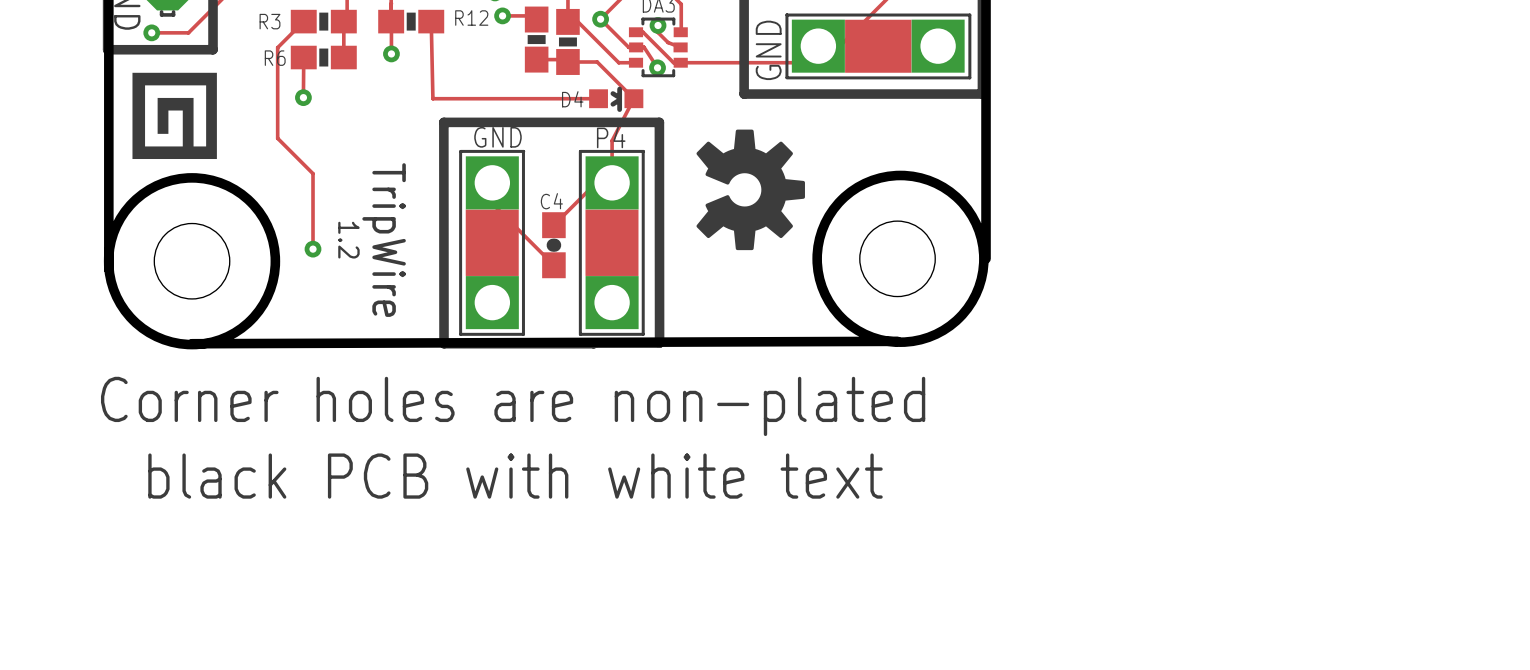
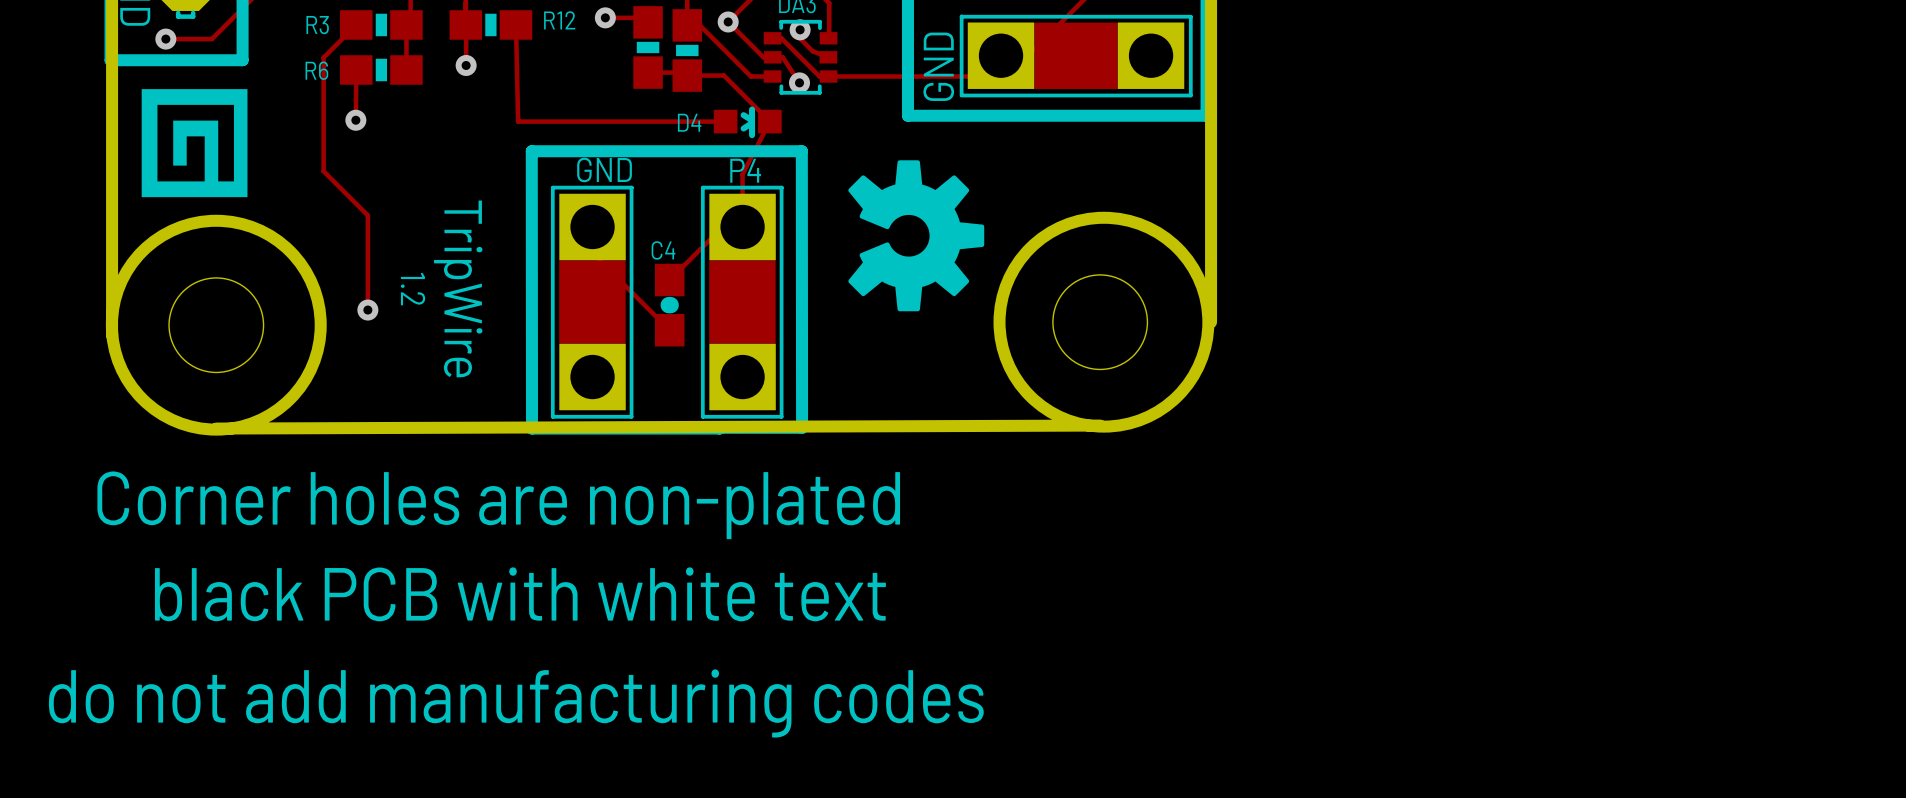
text: none -> do not add manufacturing codes (516, 703)

